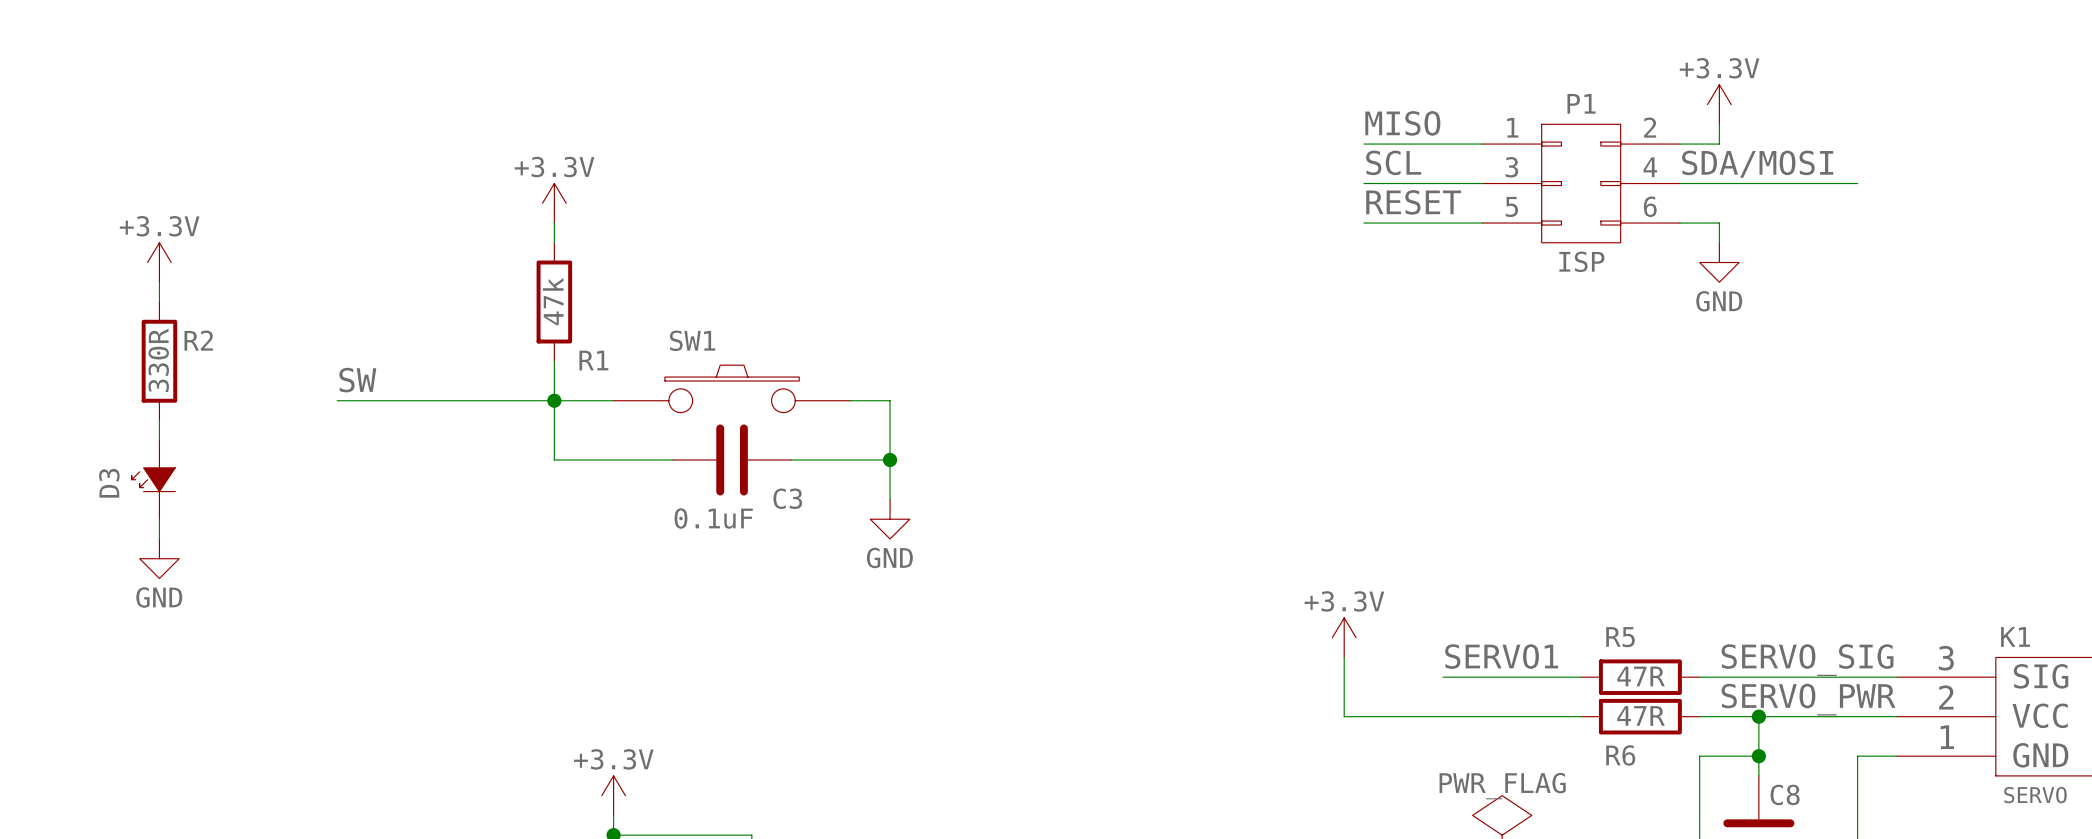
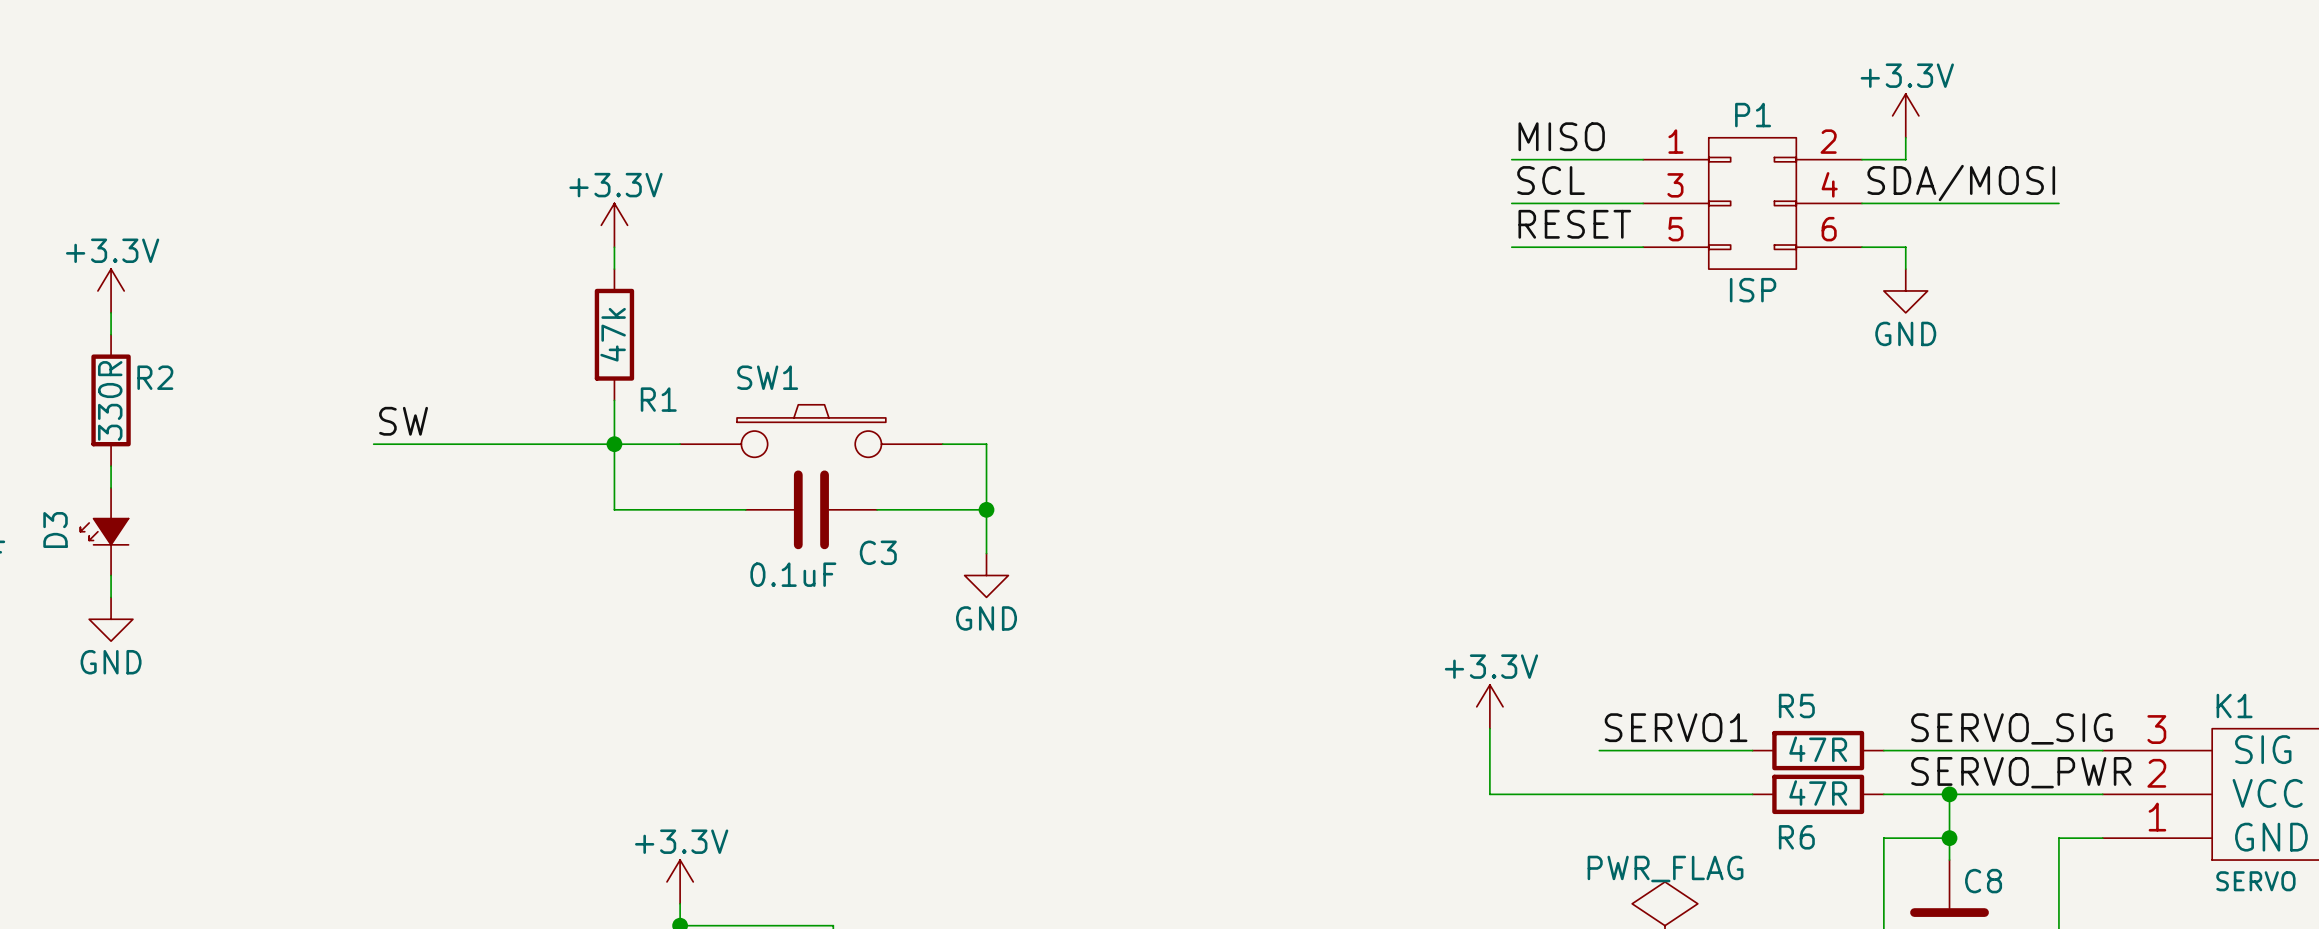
power symbol position: +3.3V (159, 262) -> +3.3V (111, 290)
wire: (159, 282) (159, 302) -> (111, 312) (111, 334)
R2 position: (159, 361) -> (111, 400)
wire: (159, 420) (159, 440) -> (111, 466) (111, 487)
D3 position: (153, 479) -> (104, 531)
wire: (159, 519) (159, 538) -> (111, 575) (111, 597)
power symbol position: GND (159, 558) -> GND (111, 619)

